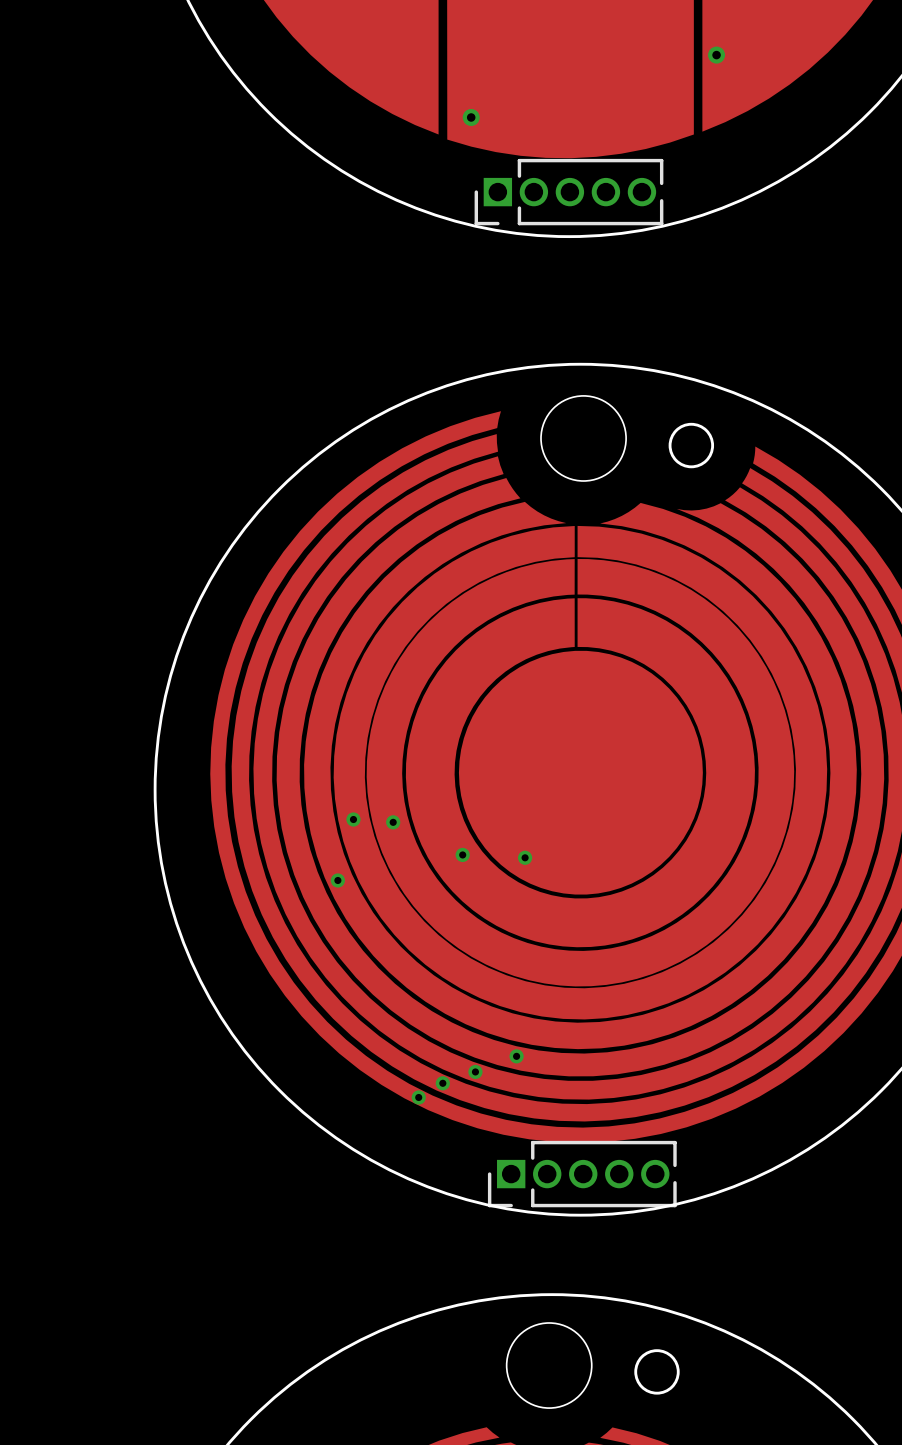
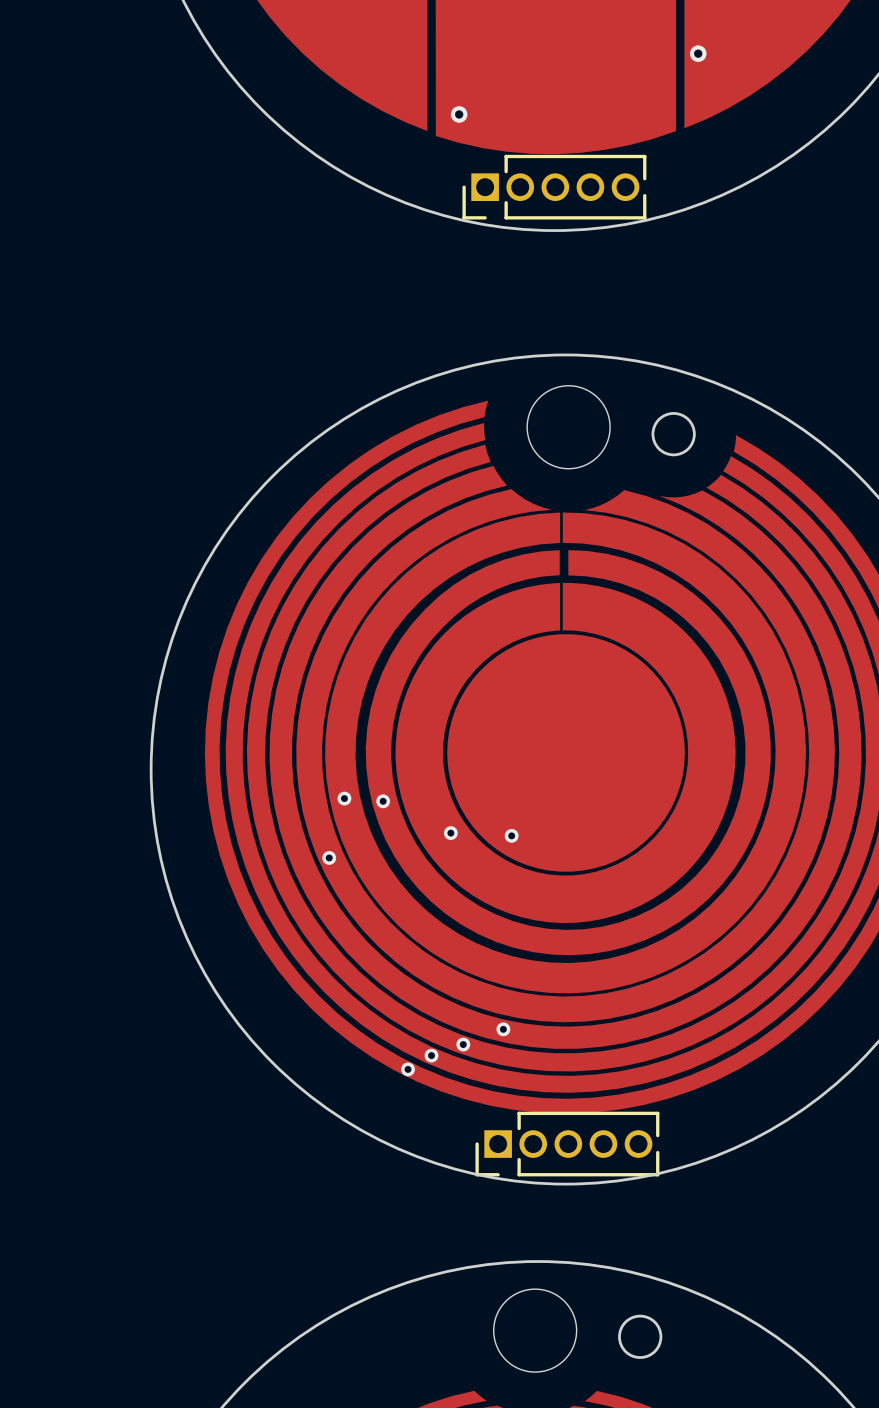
drawing shape: [366, 558, 795, 987] -> [365, 550, 771, 956]

